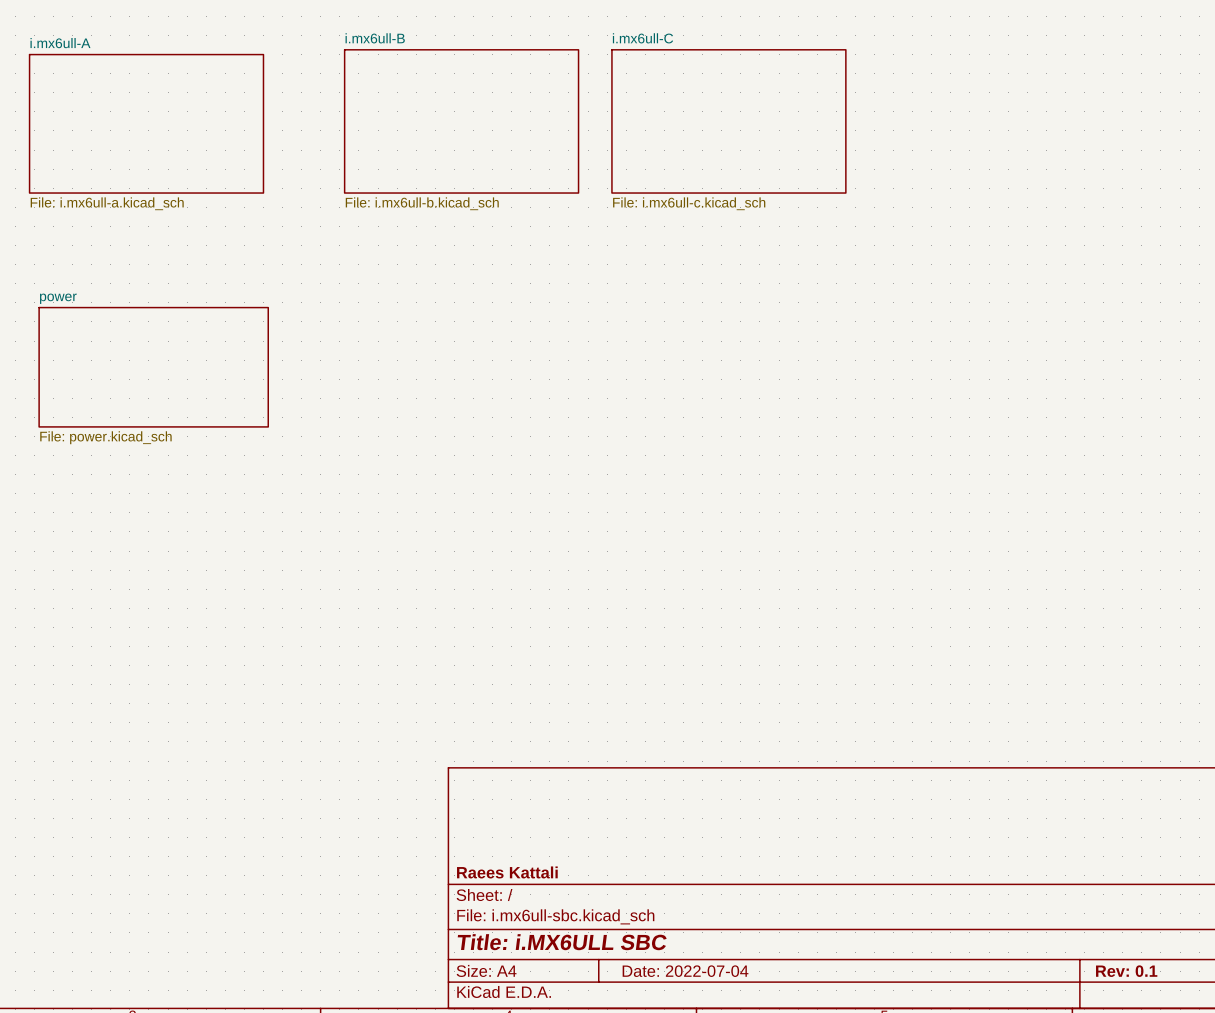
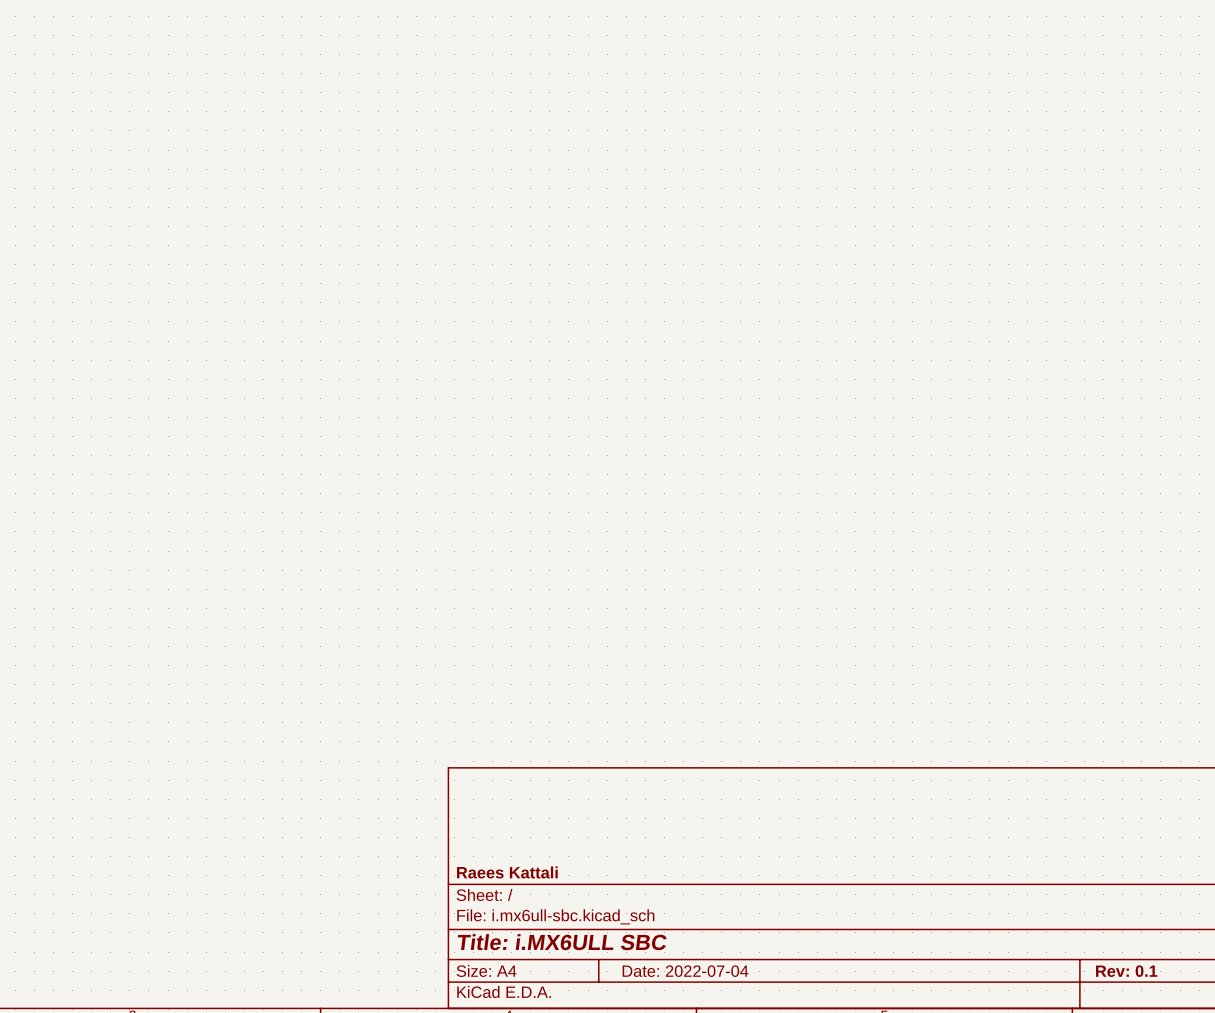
sheet i.mx6ull-B: File: i.mx6ull-b.kicad_sch (461, 121) -> none
sheet i.mx6ull-C: File: i.mx6ull-c.kicad_sch (728, 121) -> none
sheet i.mx6ull-A: File: i.mx6ull-a.kicad_sch (146, 123) -> none
sheet power: File: power.kicad_sch (153, 367) -> none

